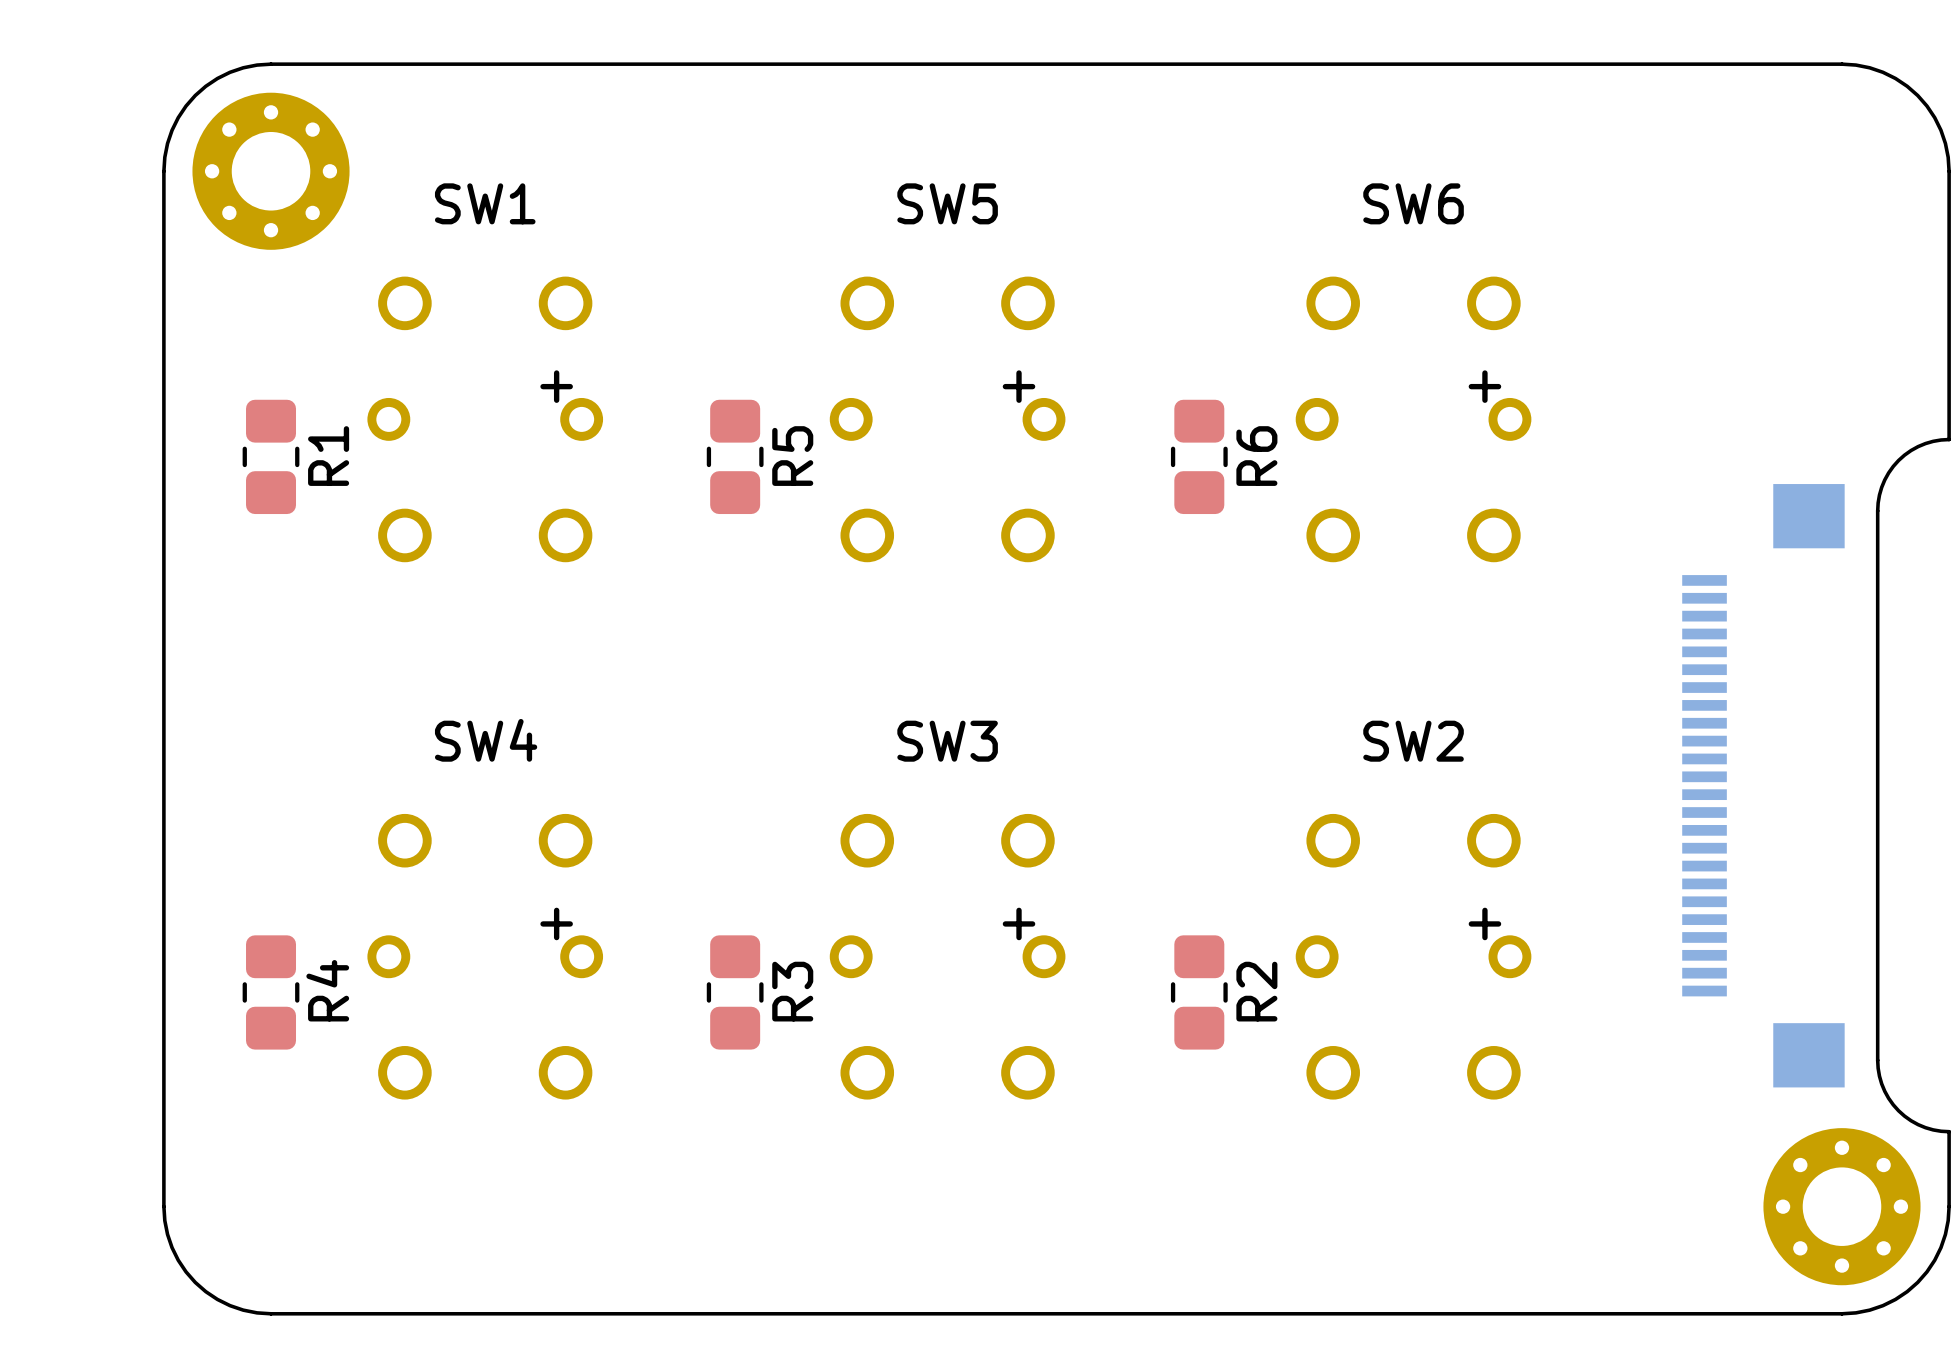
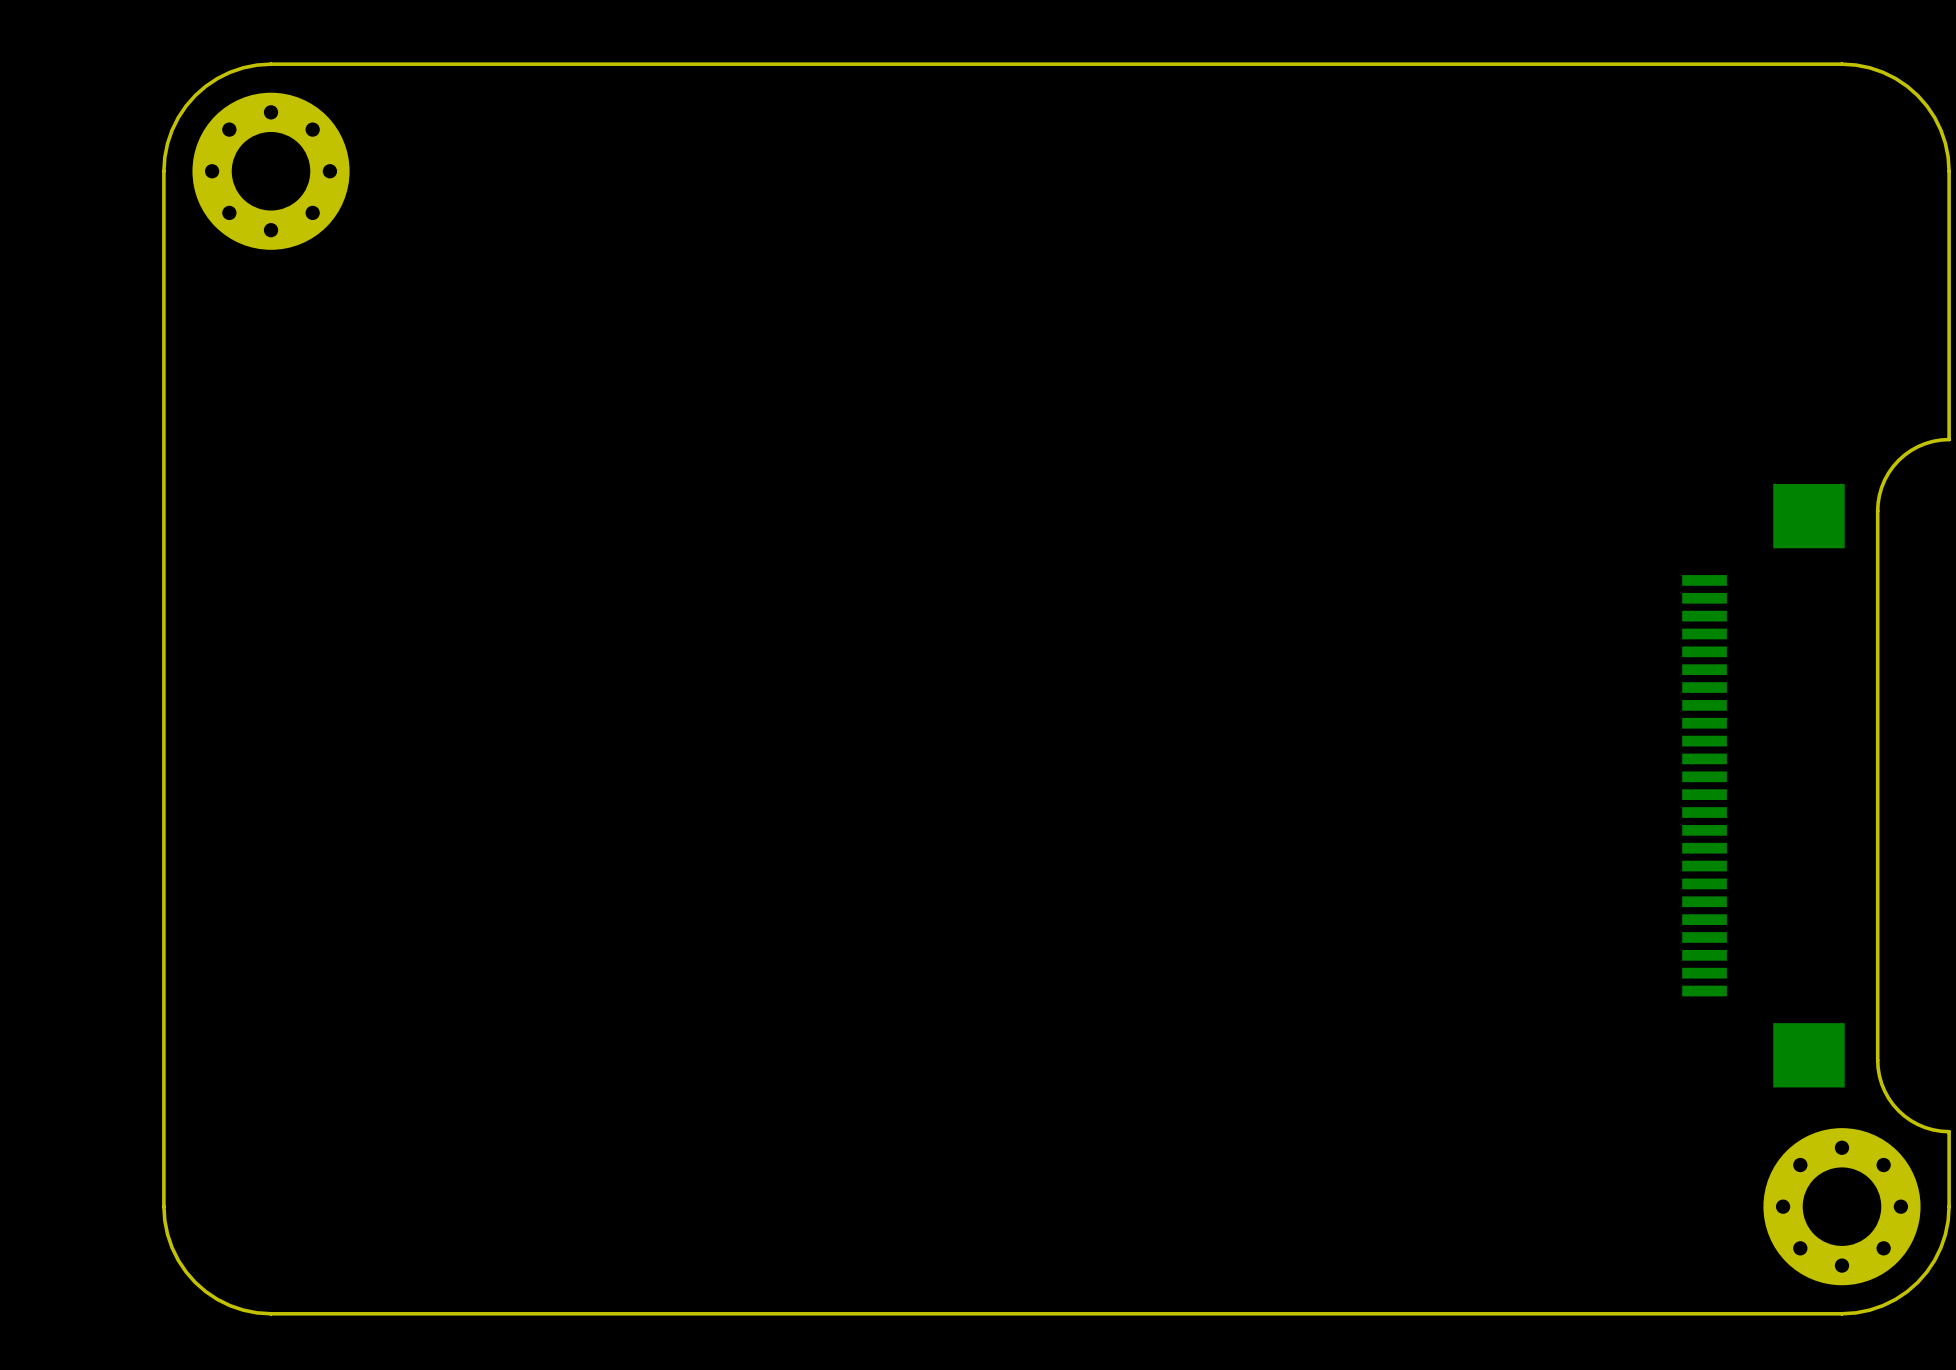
SW1: (485, 419) -> none
SW5: (947, 419) -> none
SW6: (1413, 419) -> none
R1: (271, 456) -> none
R5: (735, 456) -> none
R6: (1199, 456) -> none
SW4: (485, 956) -> none
SW3: (947, 956) -> none
SW2: (1413, 956) -> none
R4: (271, 992) -> none
R3: (735, 992) -> none
R2: (1199, 992) -> none

